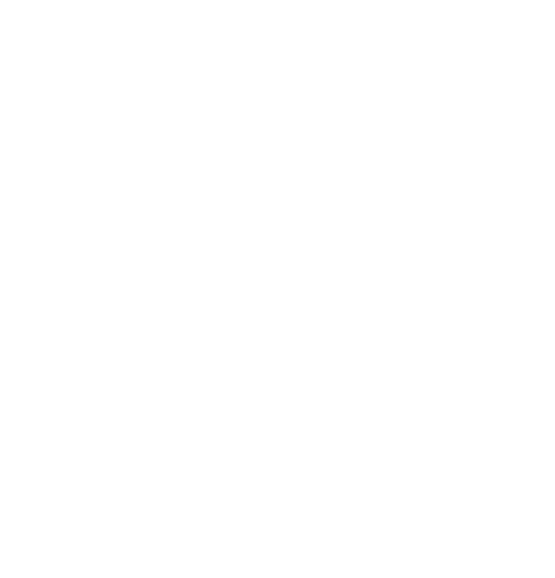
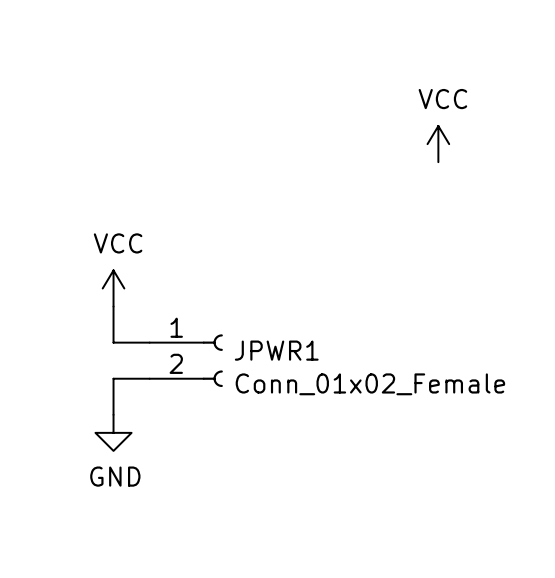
power symbol: none -> VCC (438, 144)
power symbol: none -> VCC (113, 288)
wire: none -> (113, 306) (113, 342) (149, 342)
JPWR1: none -> Conn_01x02_Female (186, 360)
wire: none -> (149, 378) (113, 378) (113, 414)
power symbol: none -> GND (113, 432)

